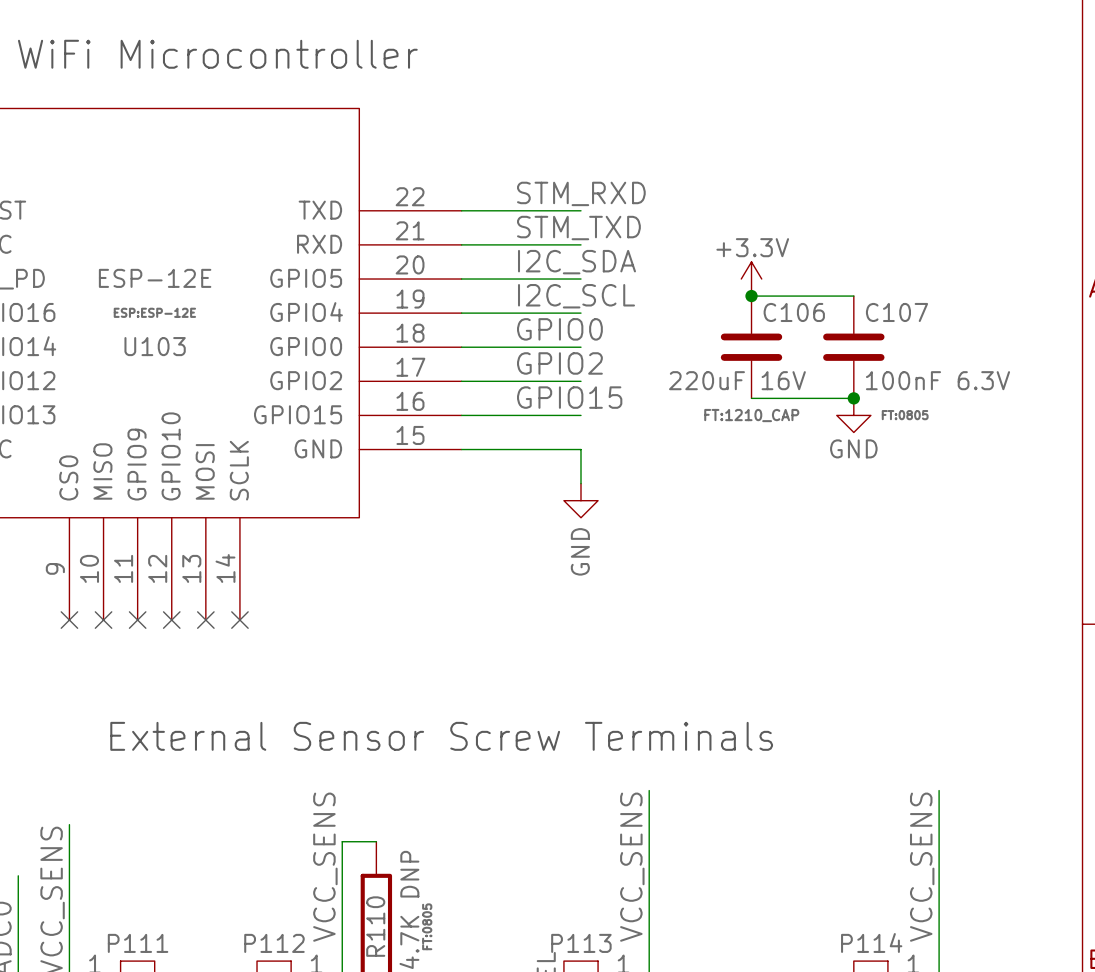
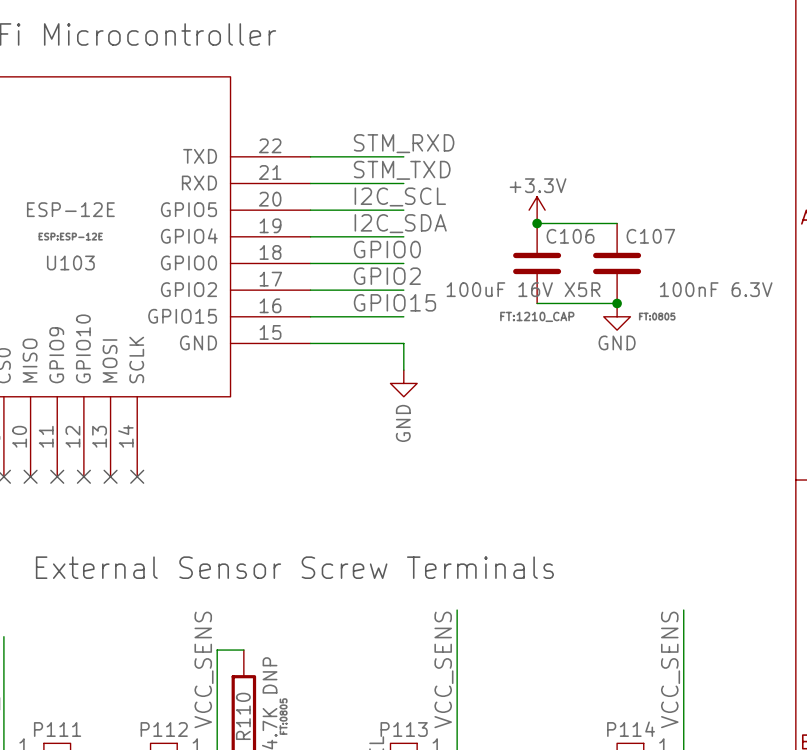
label: I2C_SDA (576, 262) -> I2C_SCL (400, 196)
label: I2C_SCL (576, 296) -> I2C_SDA (400, 223)
C106 value: 220uF 16V (737, 380) -> 100uF 16V X5R (523, 289)
C107 value position: 100nF 6.3V (938, 380) -> 100nF 6.3V (716, 289)

